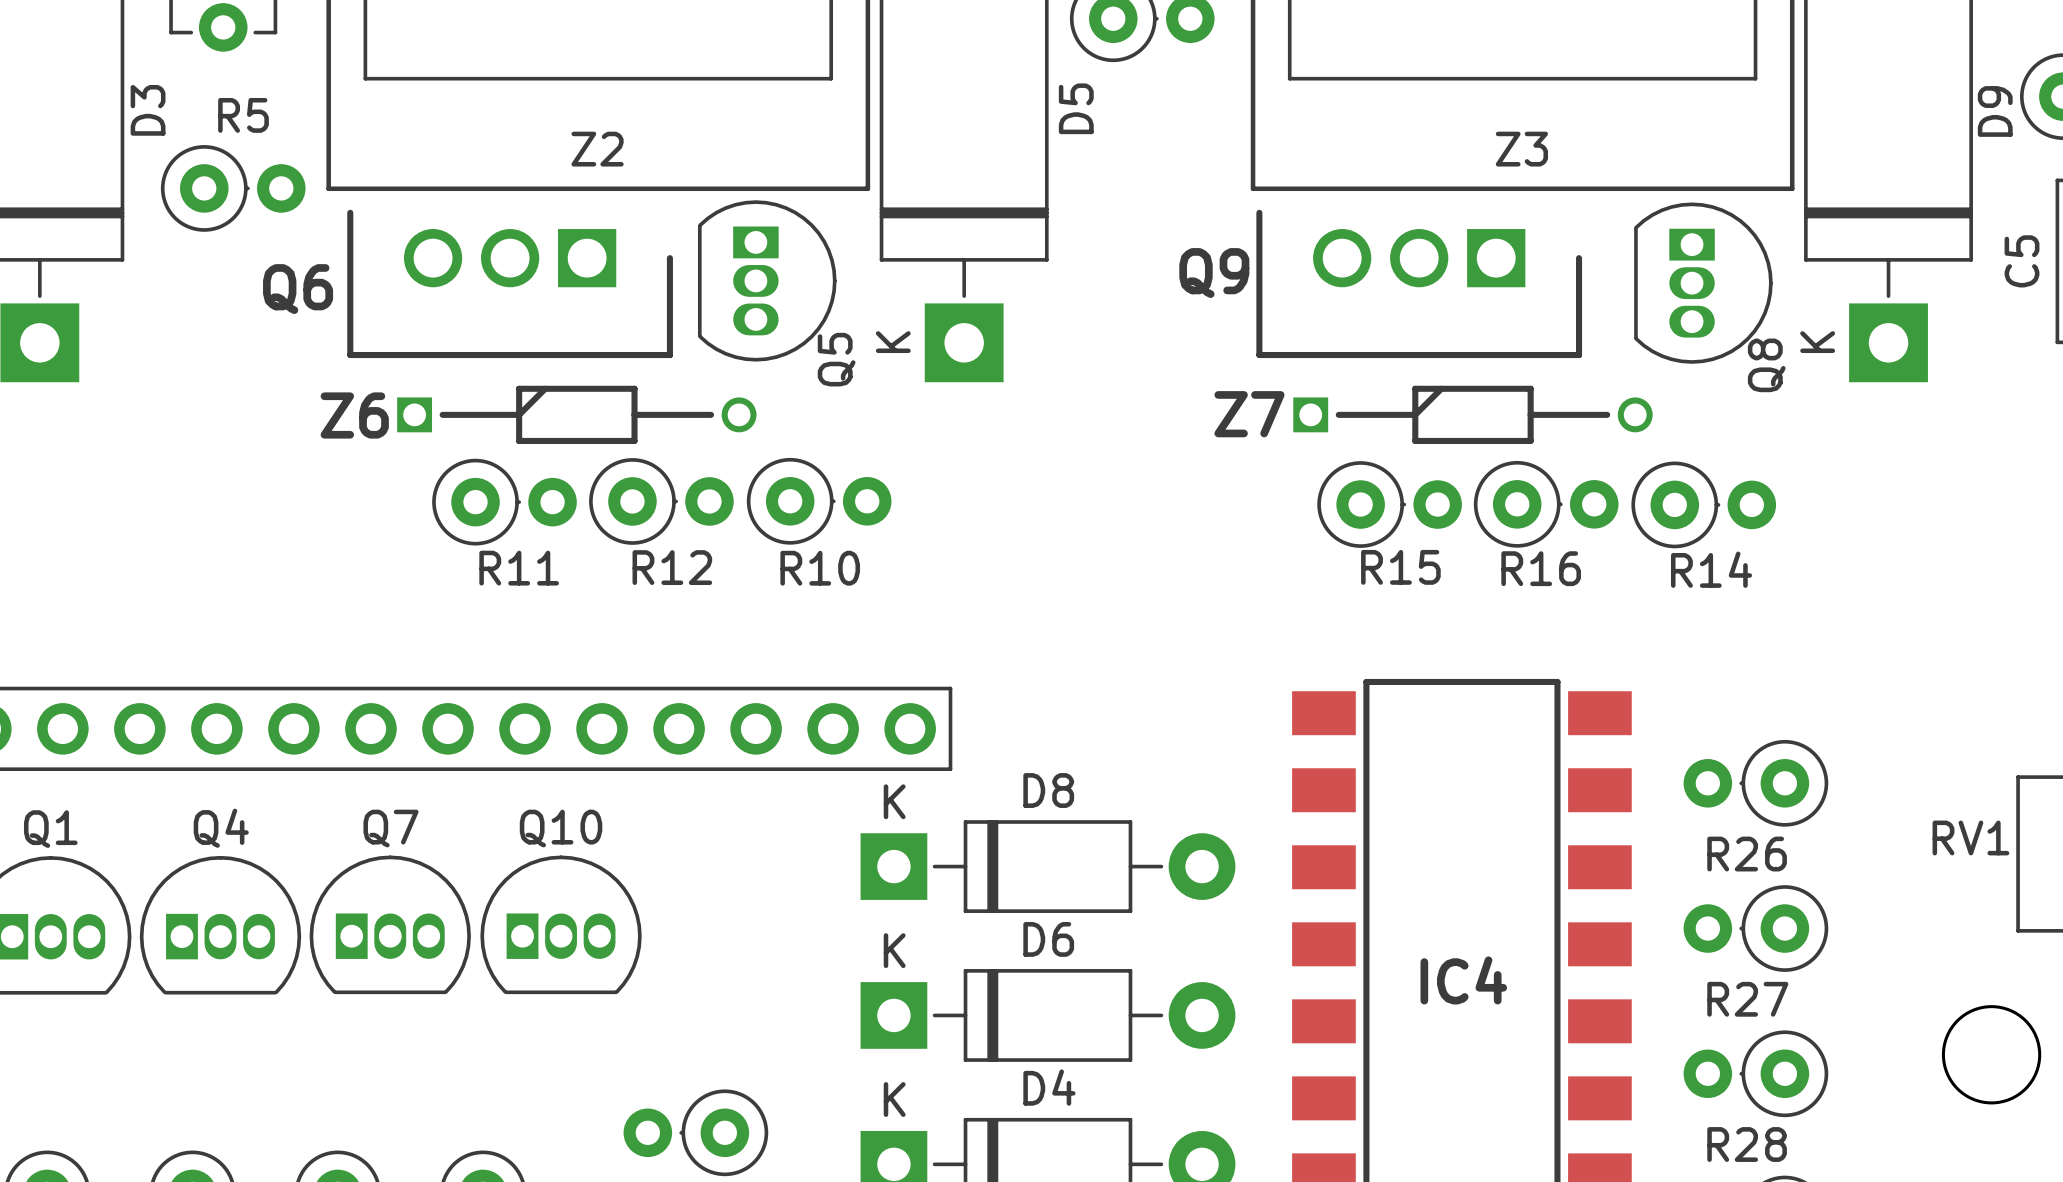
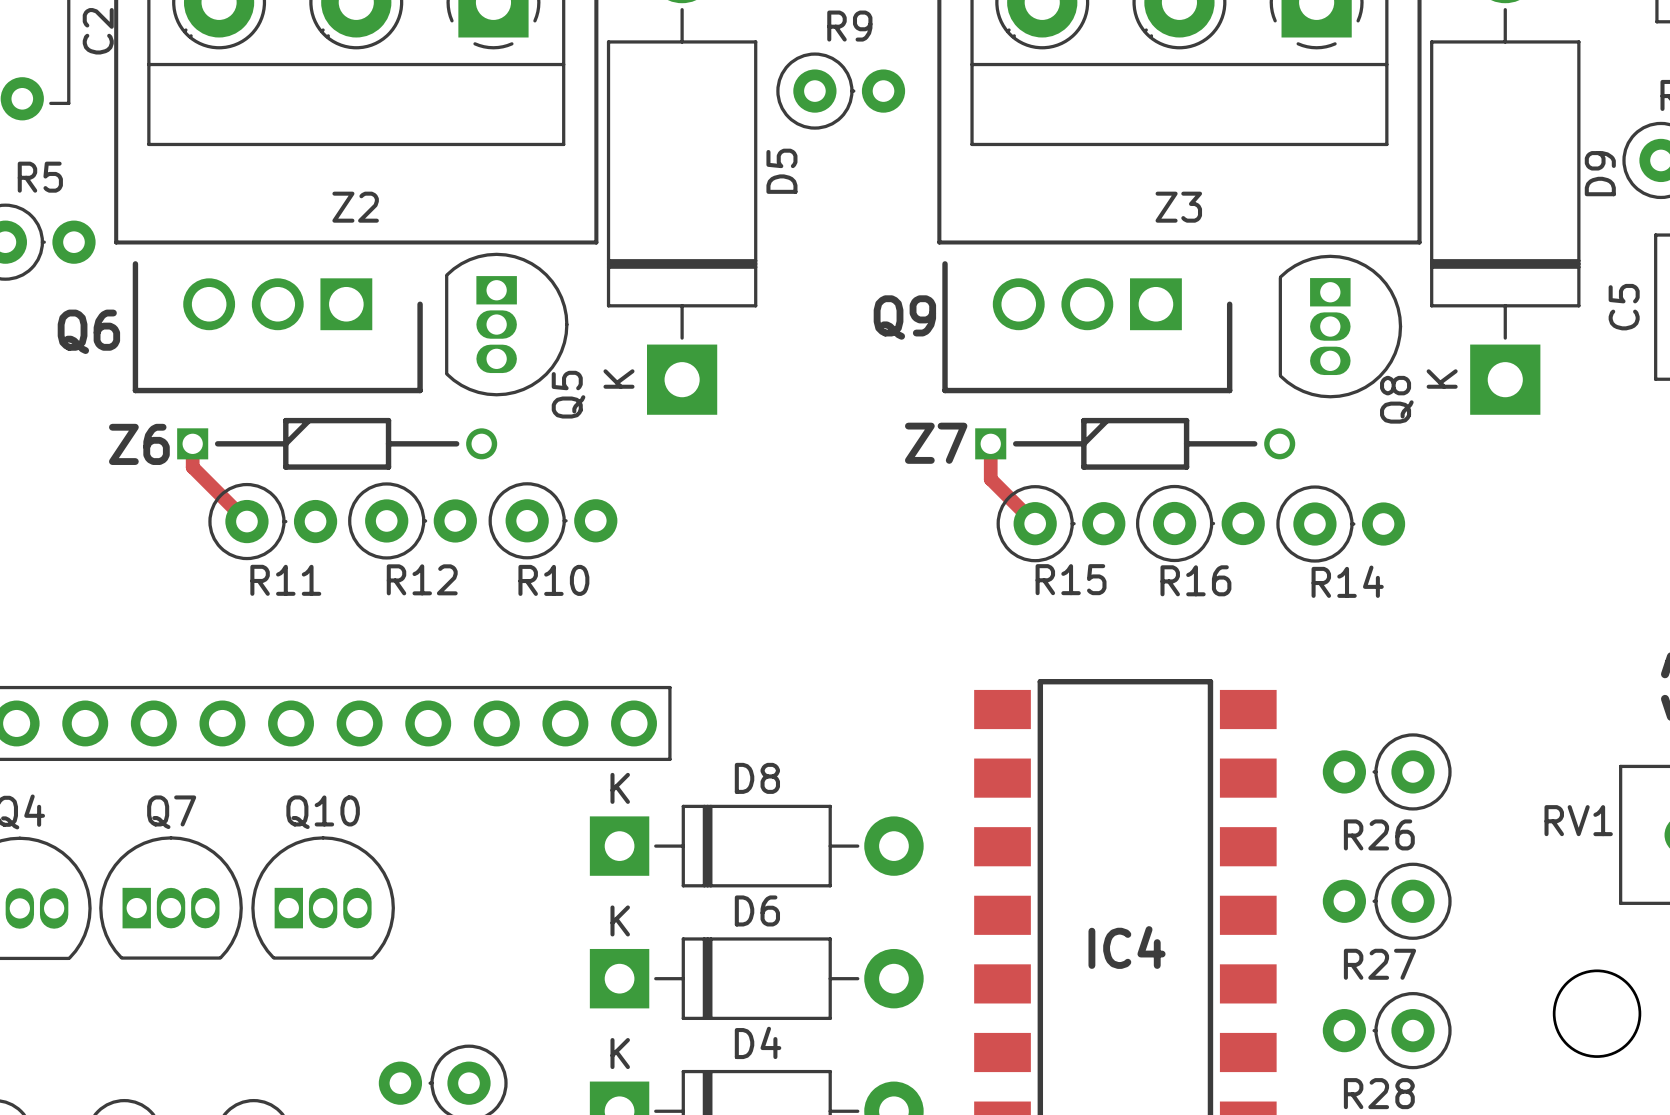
track: none -> (192, 443) (192, 467) (246, 521)
track: none -> (990, 443) (990, 479) (1035, 523)

